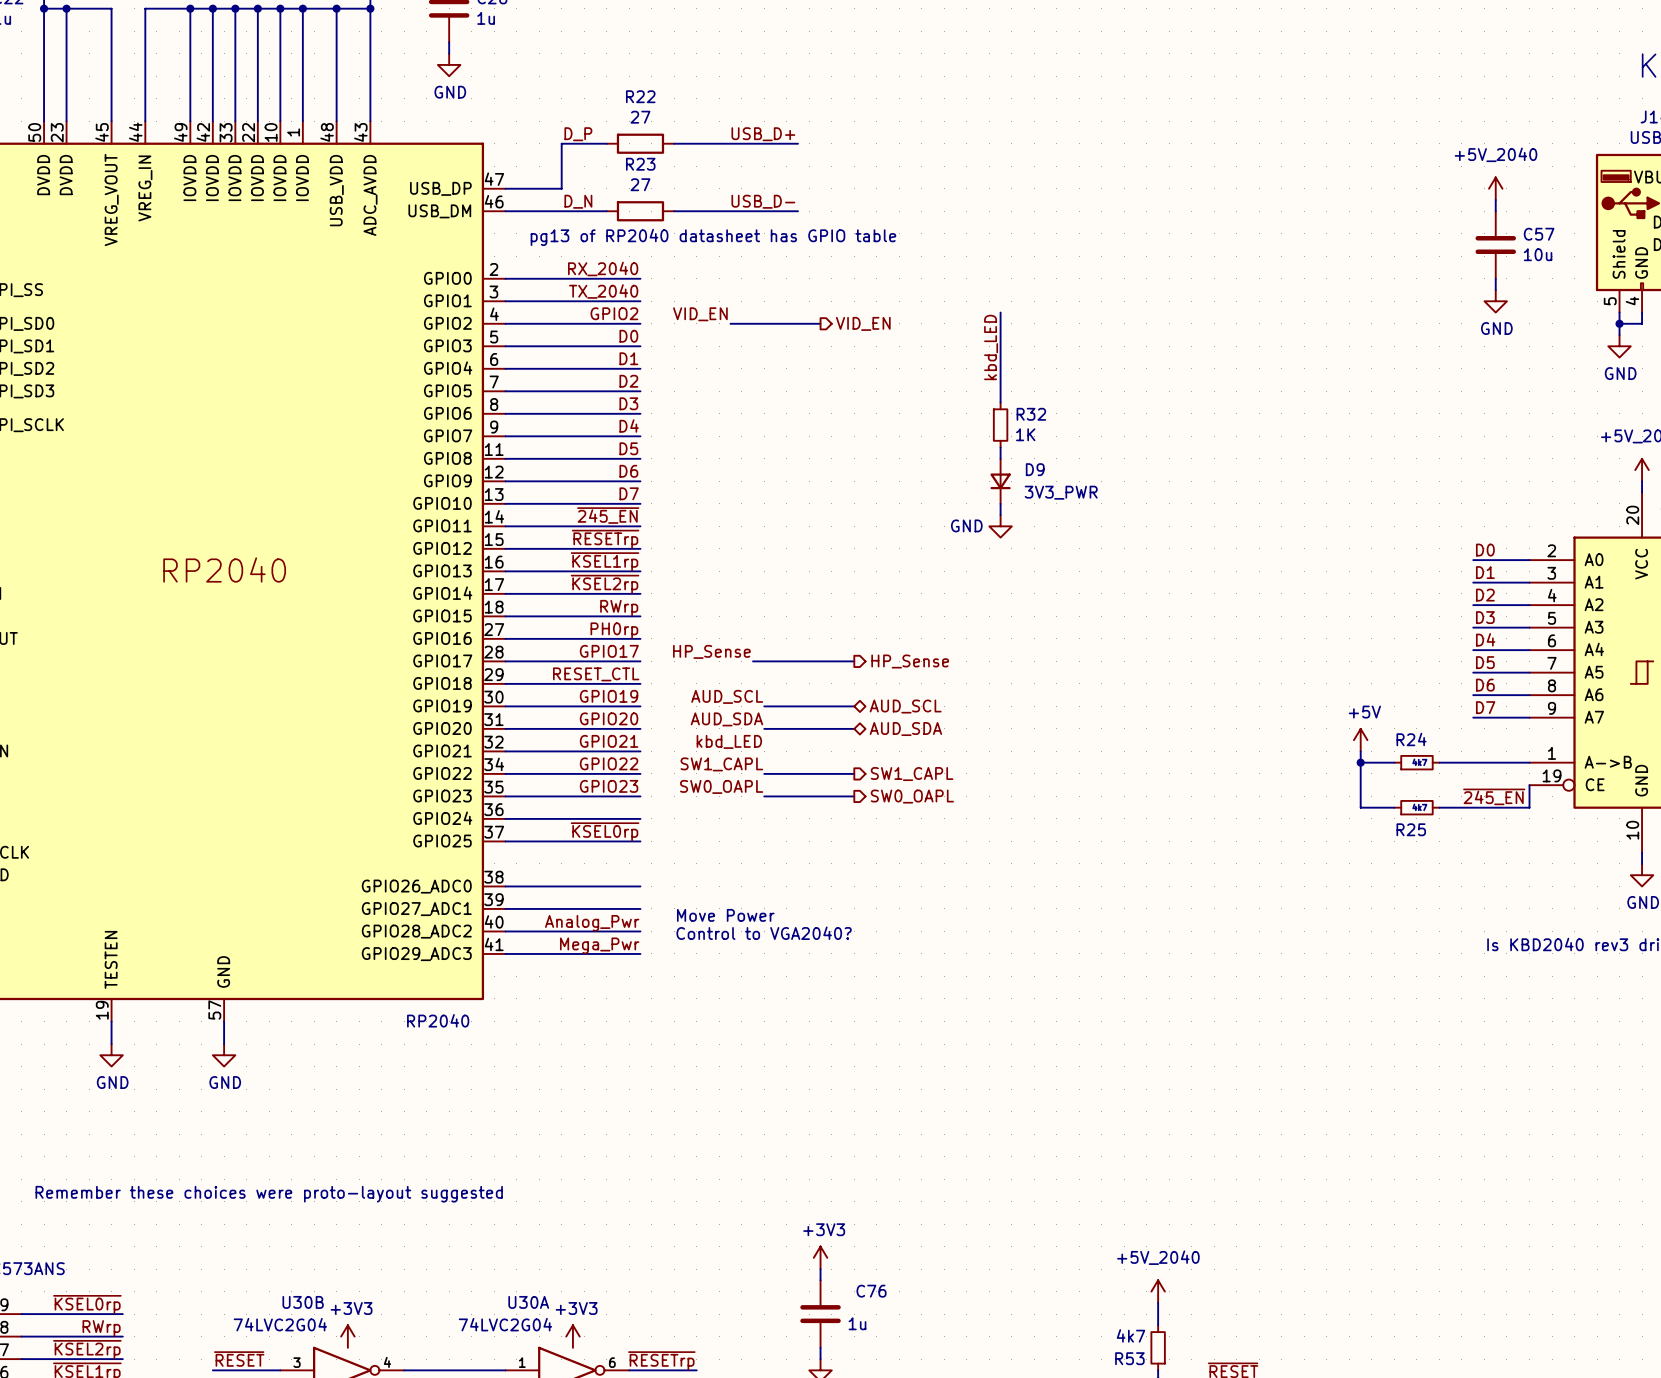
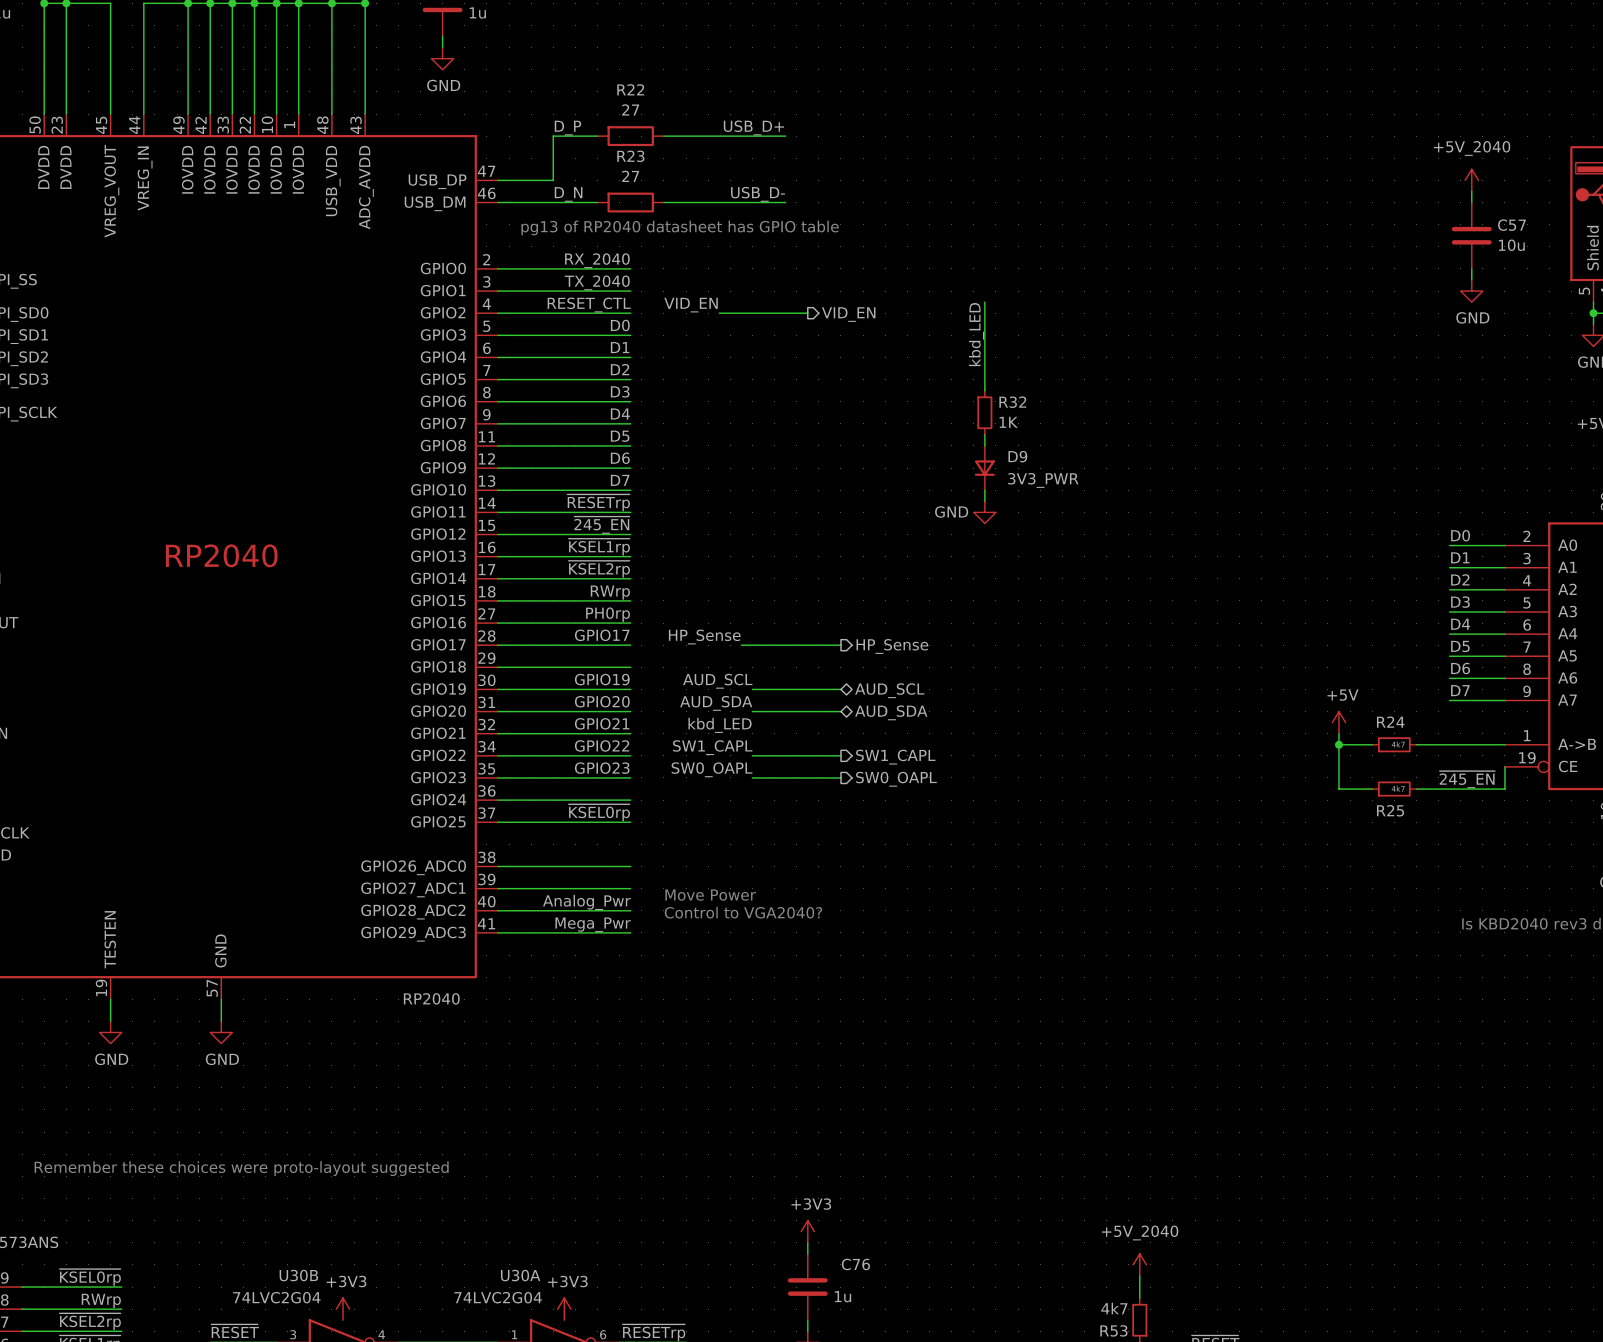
label: GPIO2 (614, 313) -> RESET_CTL (589, 305)
label: ~{245_EN} (608, 515) -> ~{RESETrp} (598, 502)
label: ~{RESETrp} (605, 539) -> ~{245_EN} (601, 525)
label: RESET_CTL (596, 674) -> none

